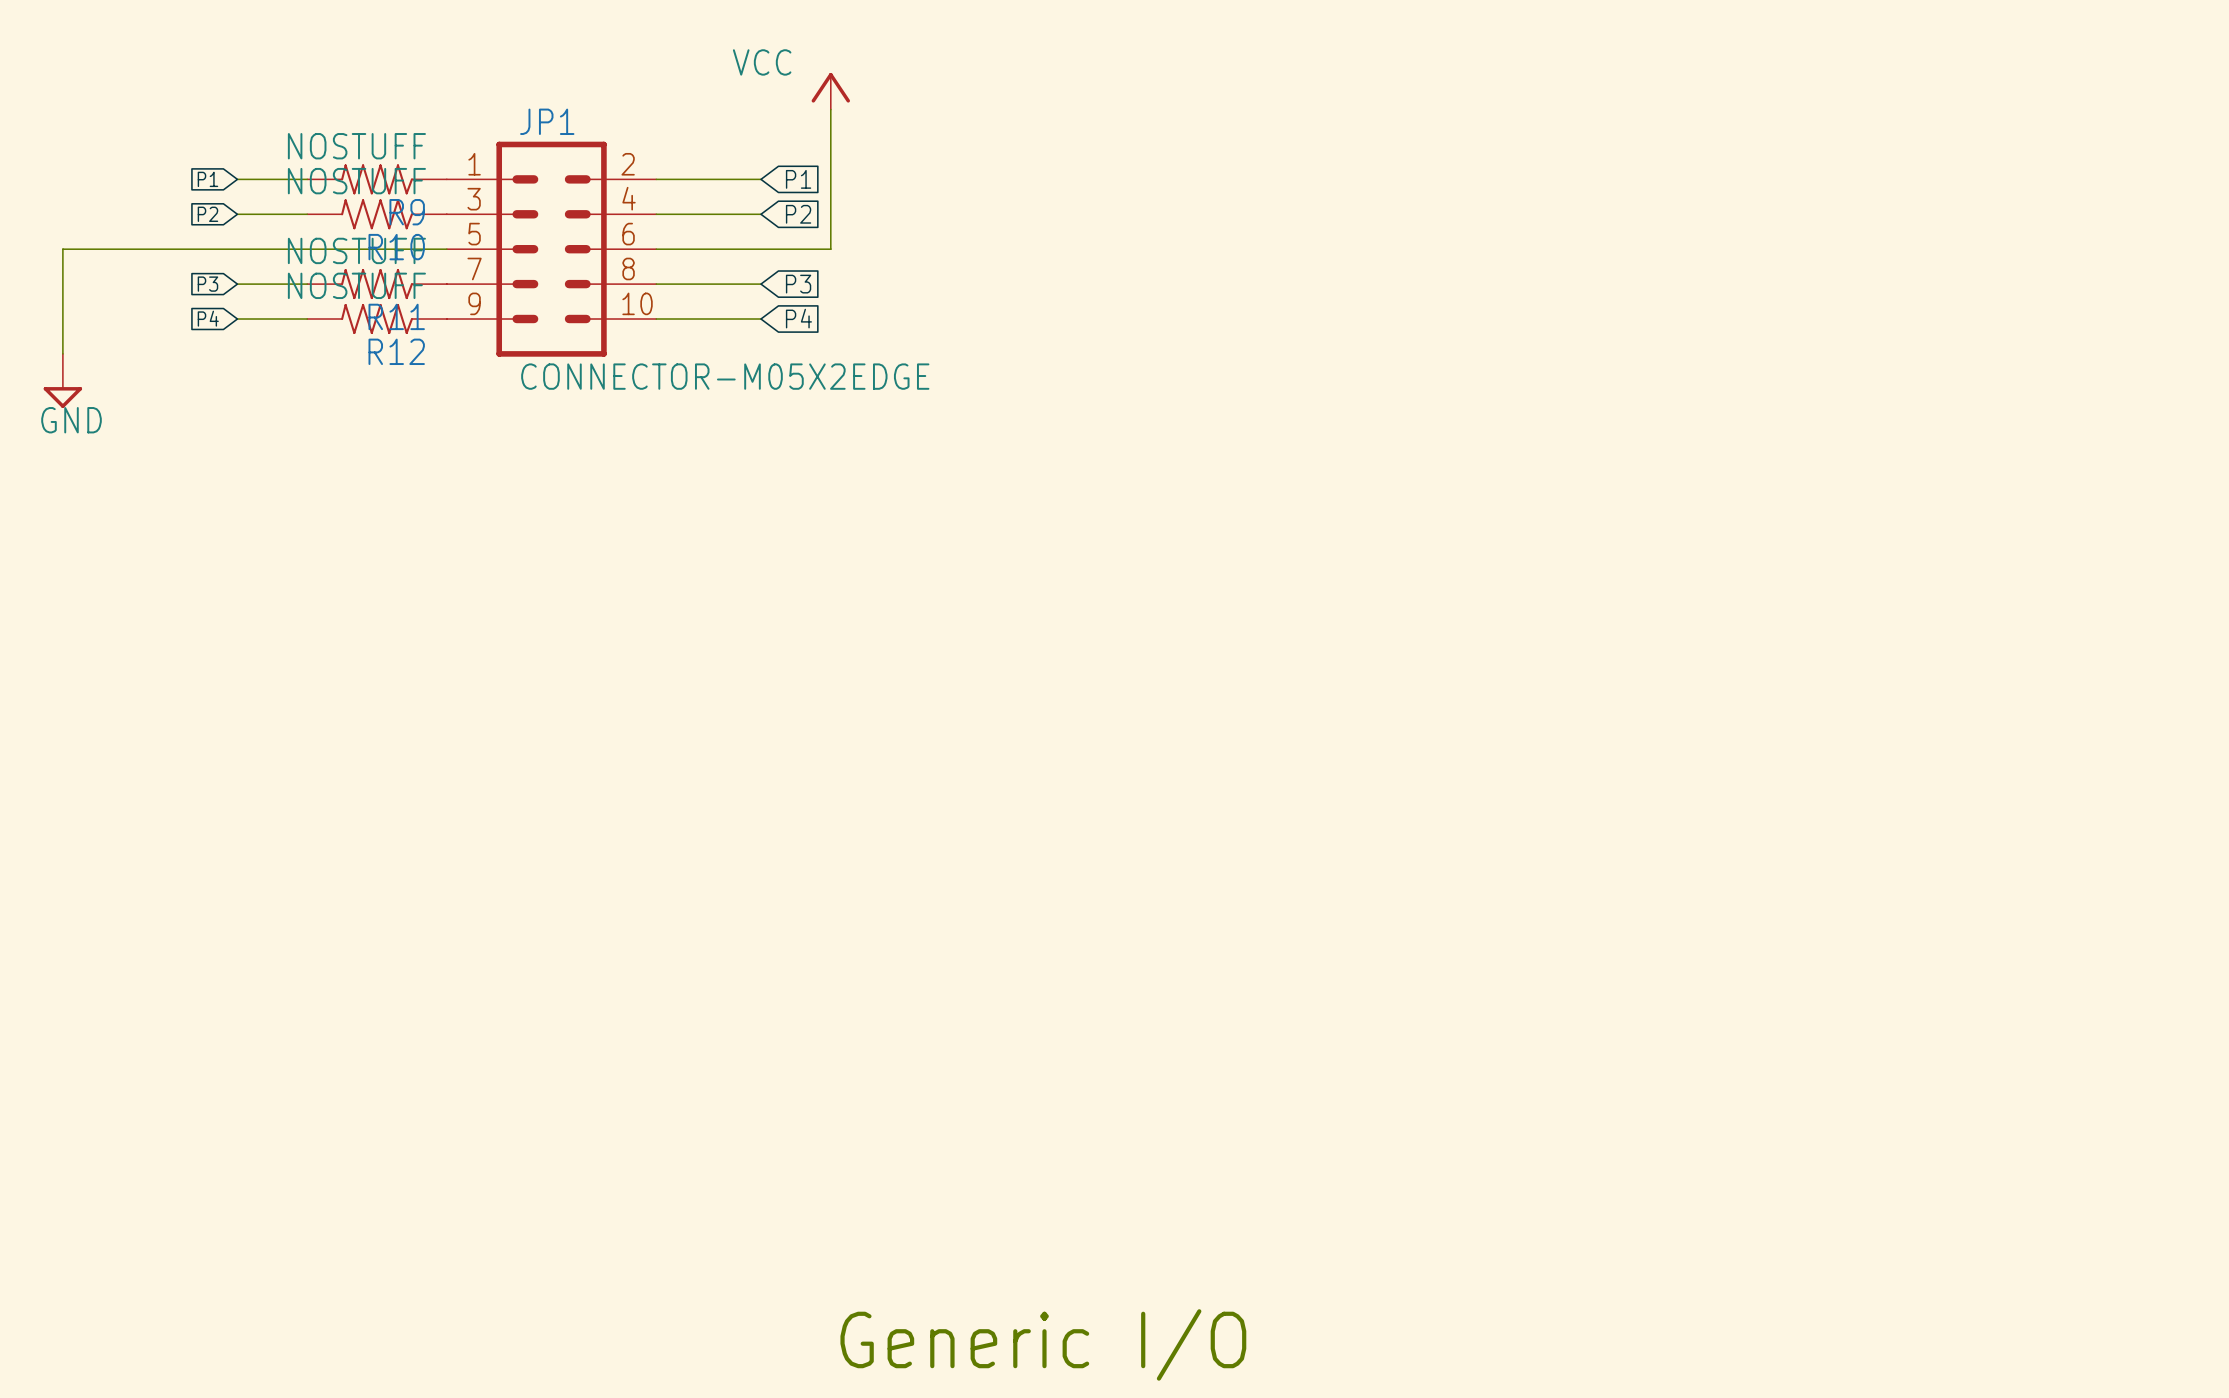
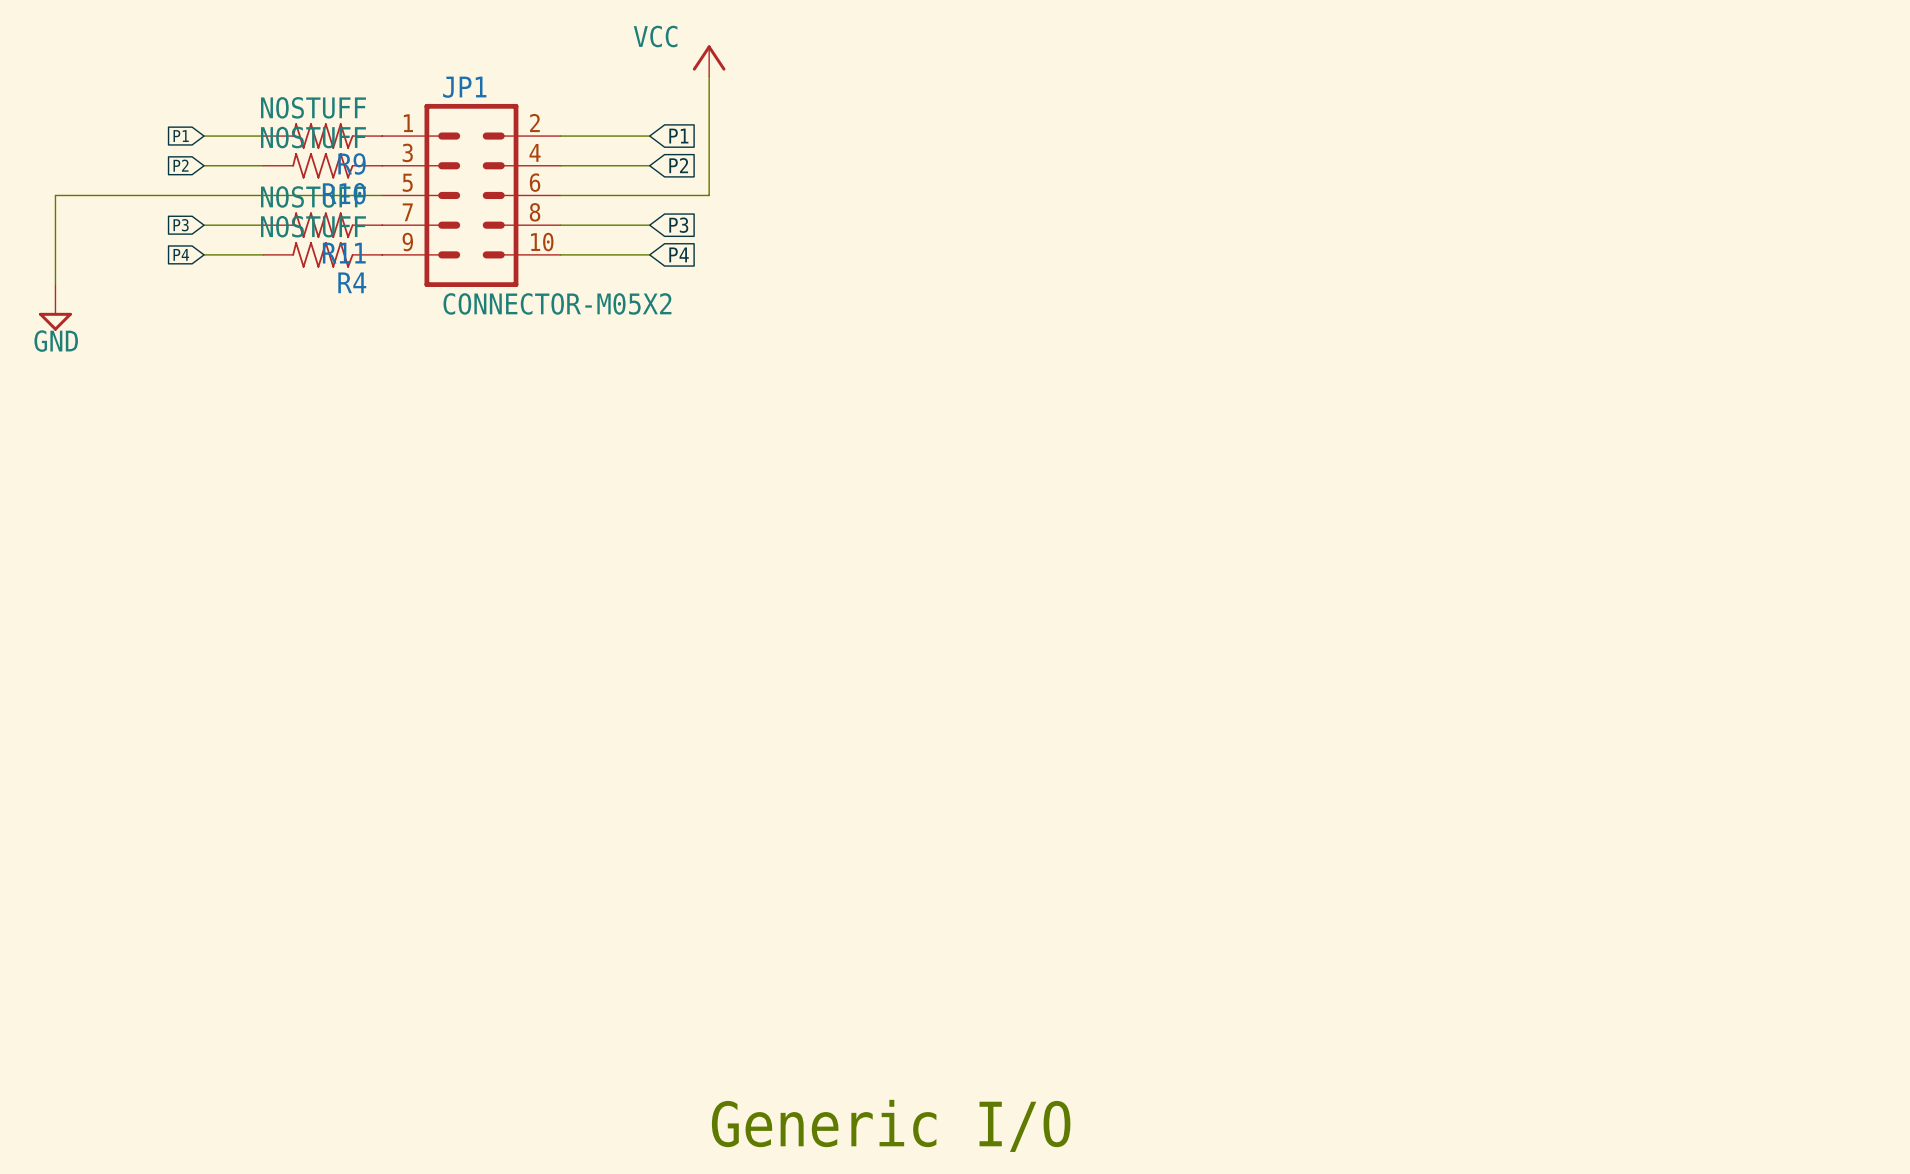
R12 name: R12 (396, 351) -> R4 (352, 282)
JP1 value: CONNECTOR-M05X2EDGE (725, 376) -> CONNECTOR-M05X2 (557, 303)

